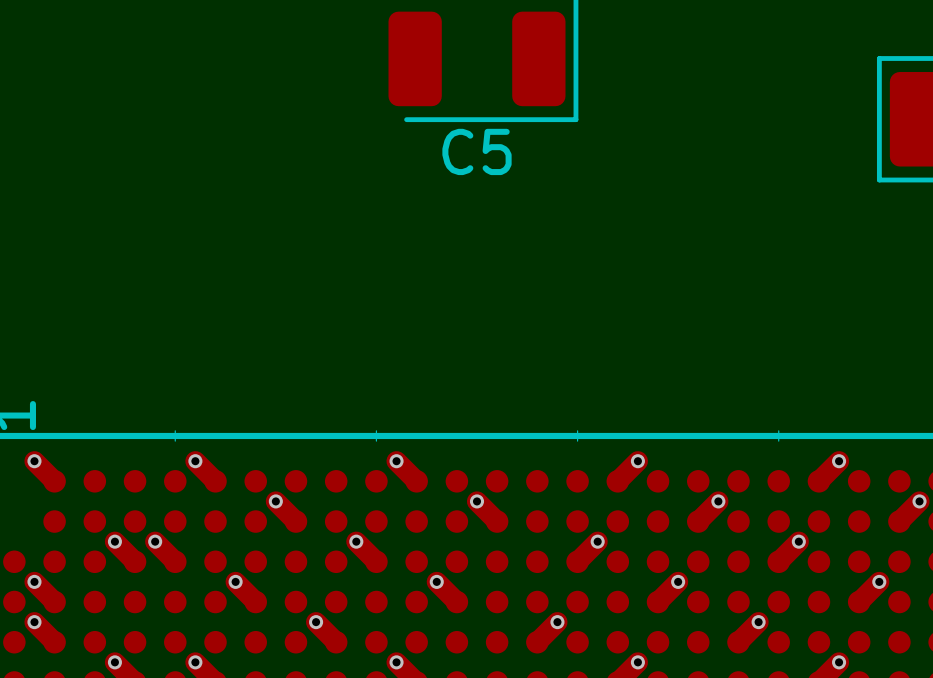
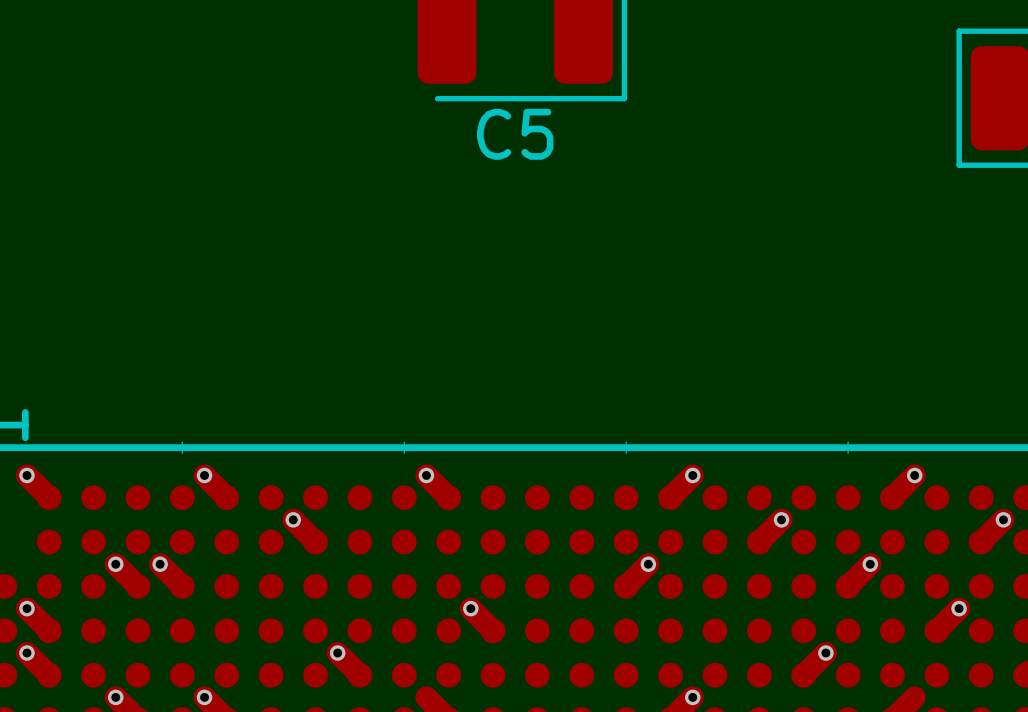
top track: (477, 501) (497, 521) -> none
via: (477, 501) -> none
top track: (356, 541) (376, 561) -> none
via: (356, 541) -> none
top track: (235, 581) (255, 602) -> none
via: (235, 581) -> none
top track: (678, 581) (658, 602) -> none
via: (678, 581) -> none
top track: (557, 622) (537, 642) -> none
via: (557, 622) -> none
via: (396, 662) -> none
via: (839, 662) -> none

